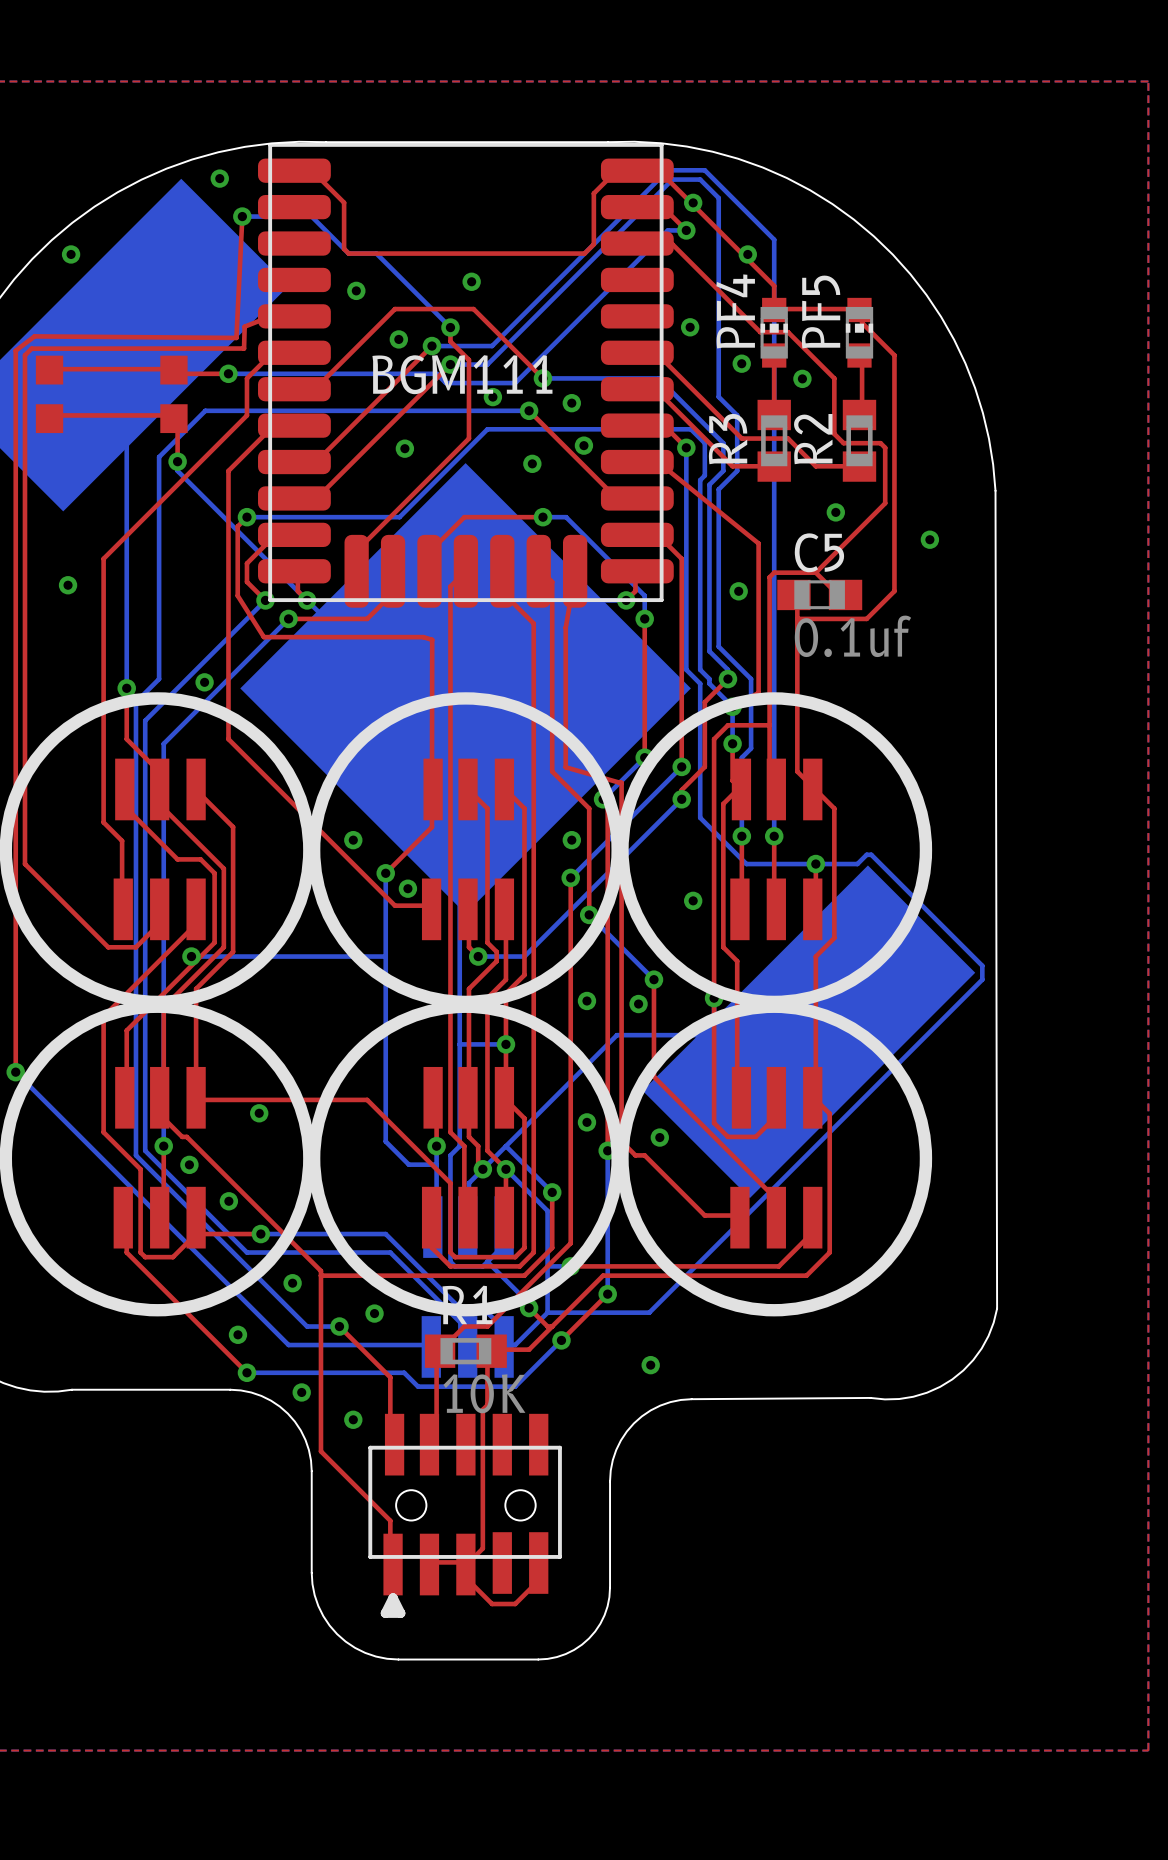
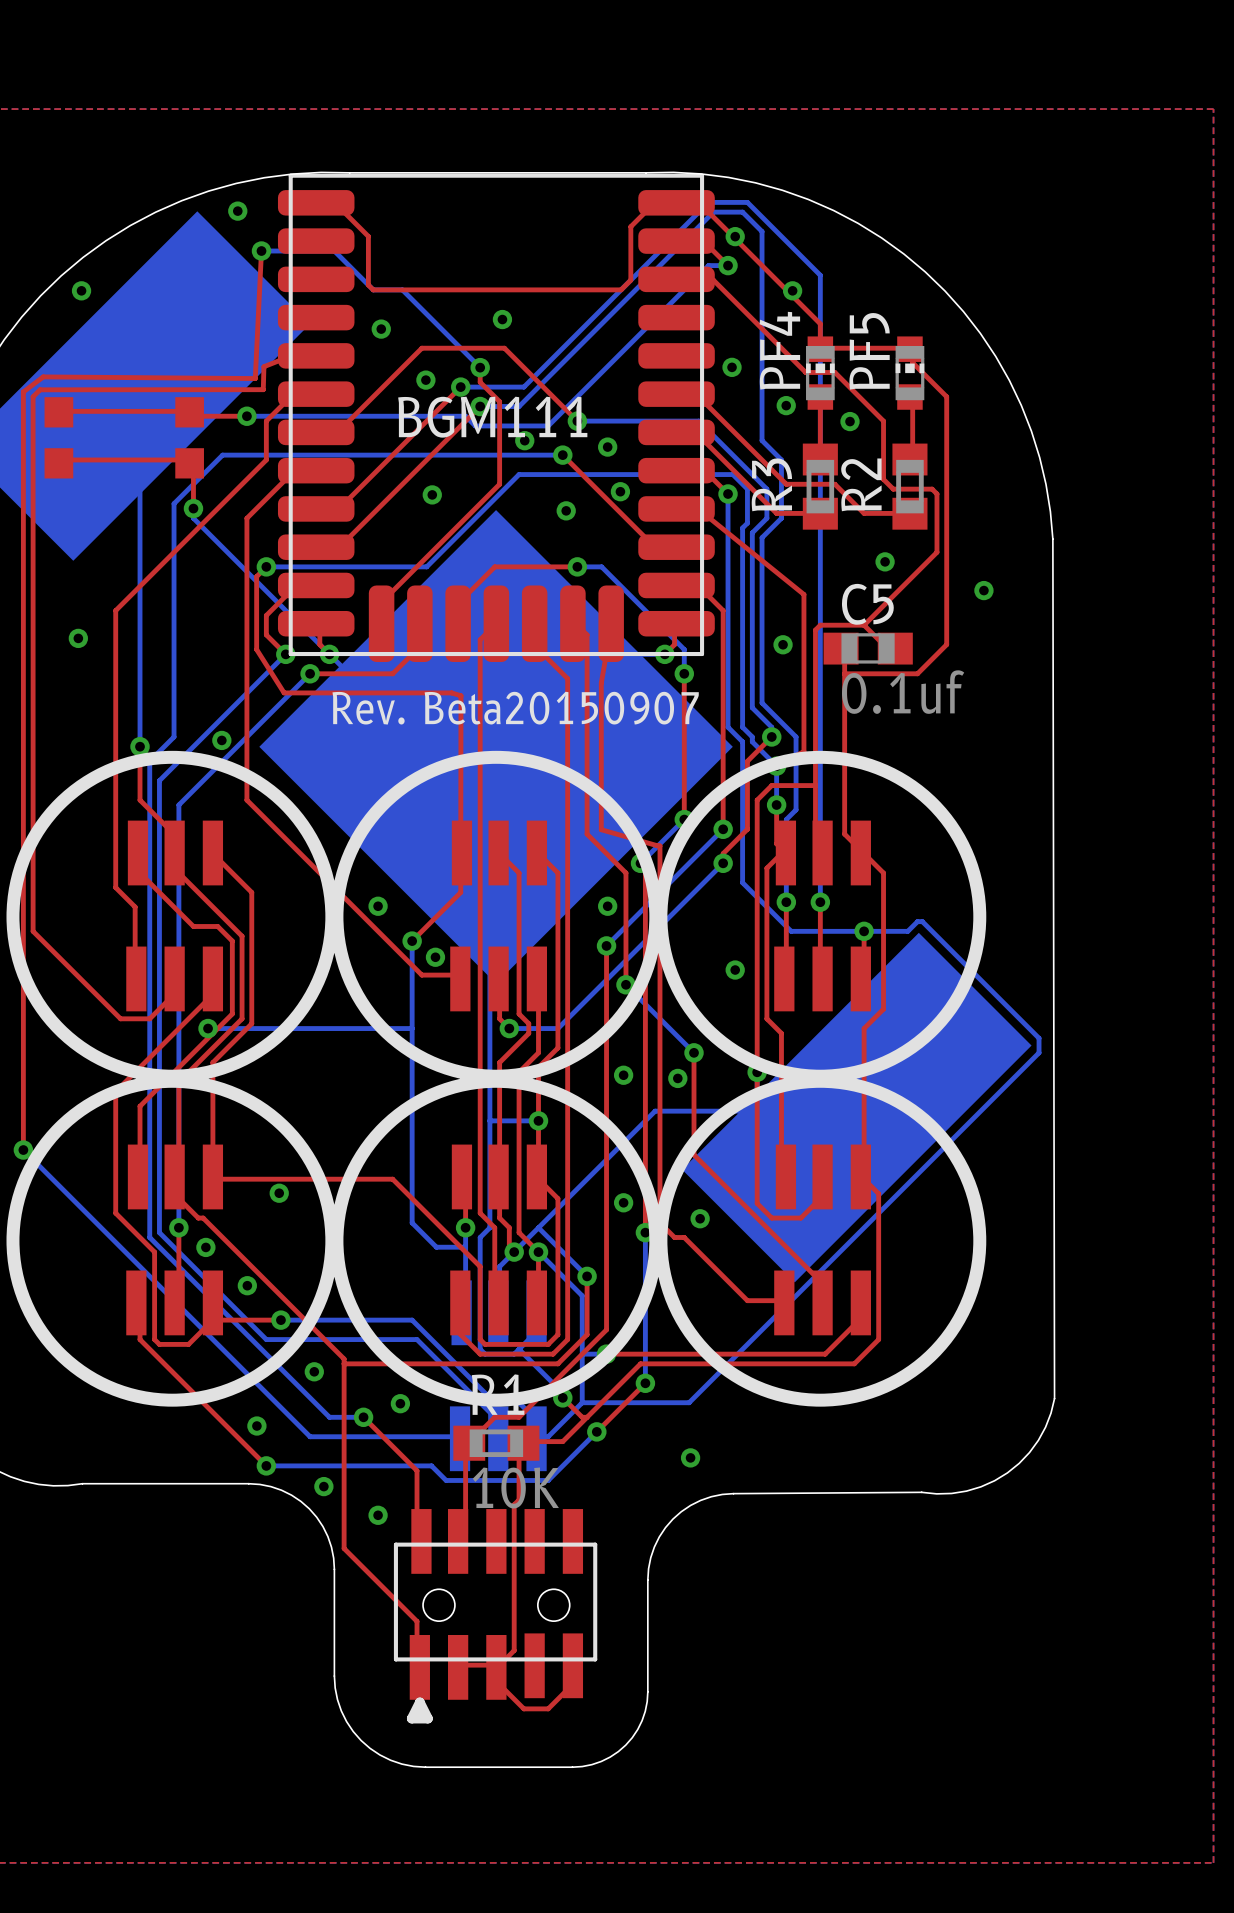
text: none -> Rev. Beta20150907 (515, 708)

